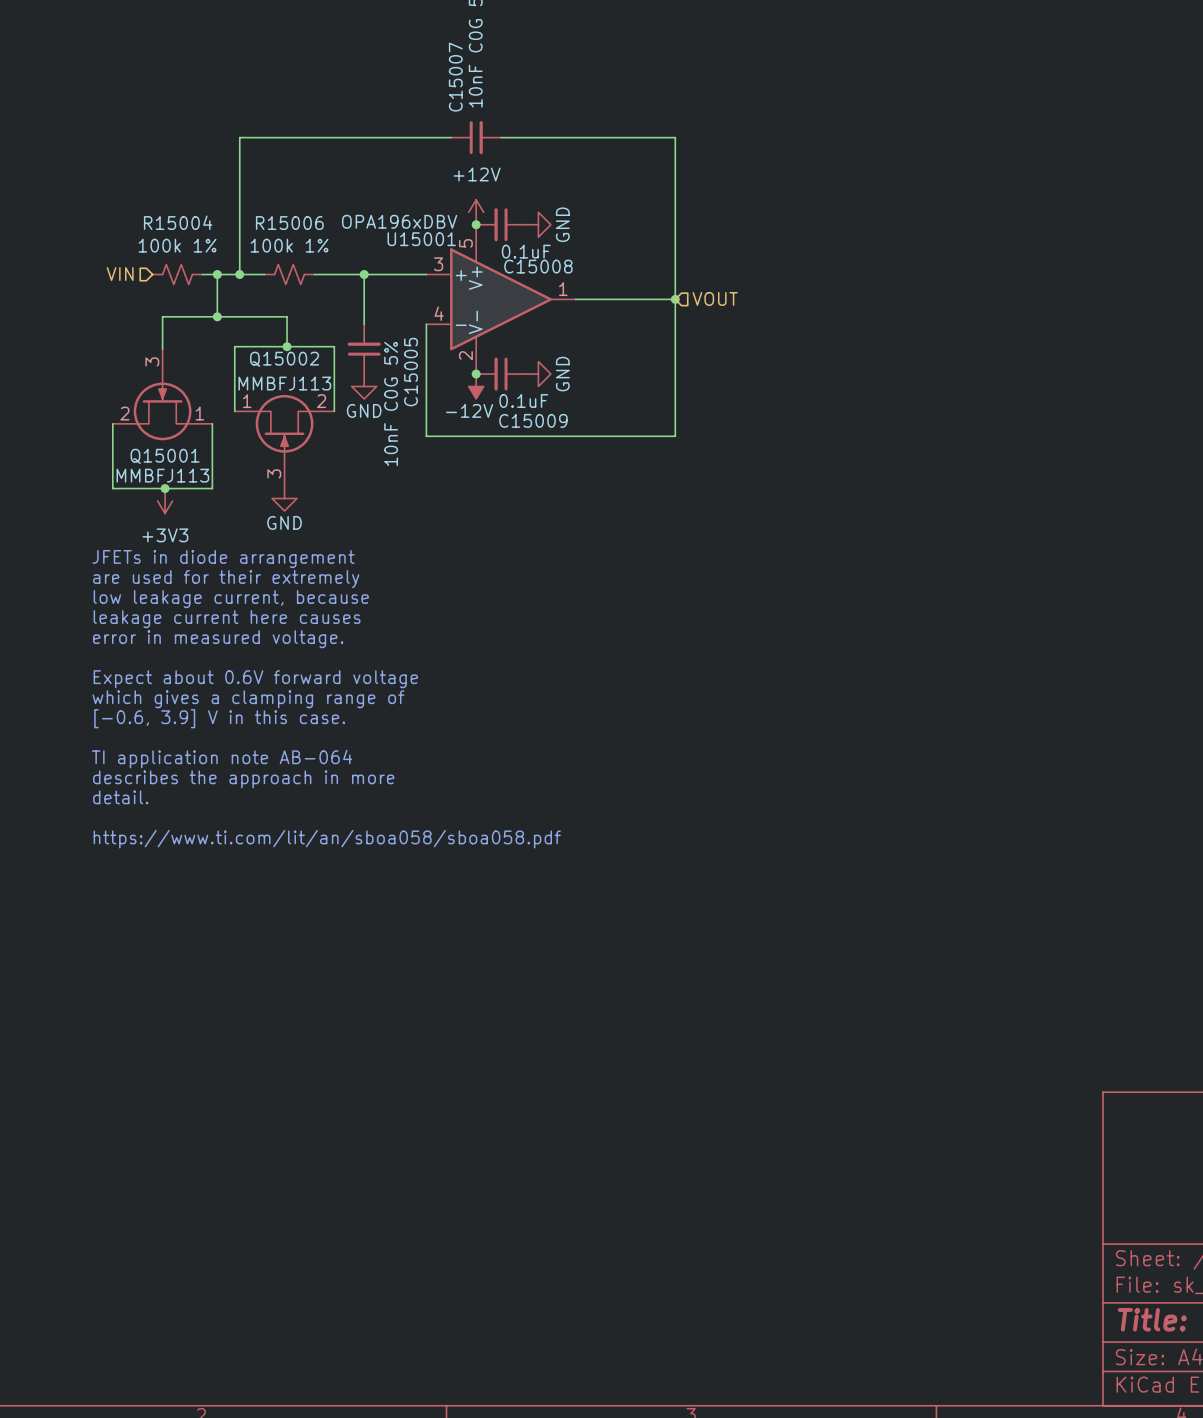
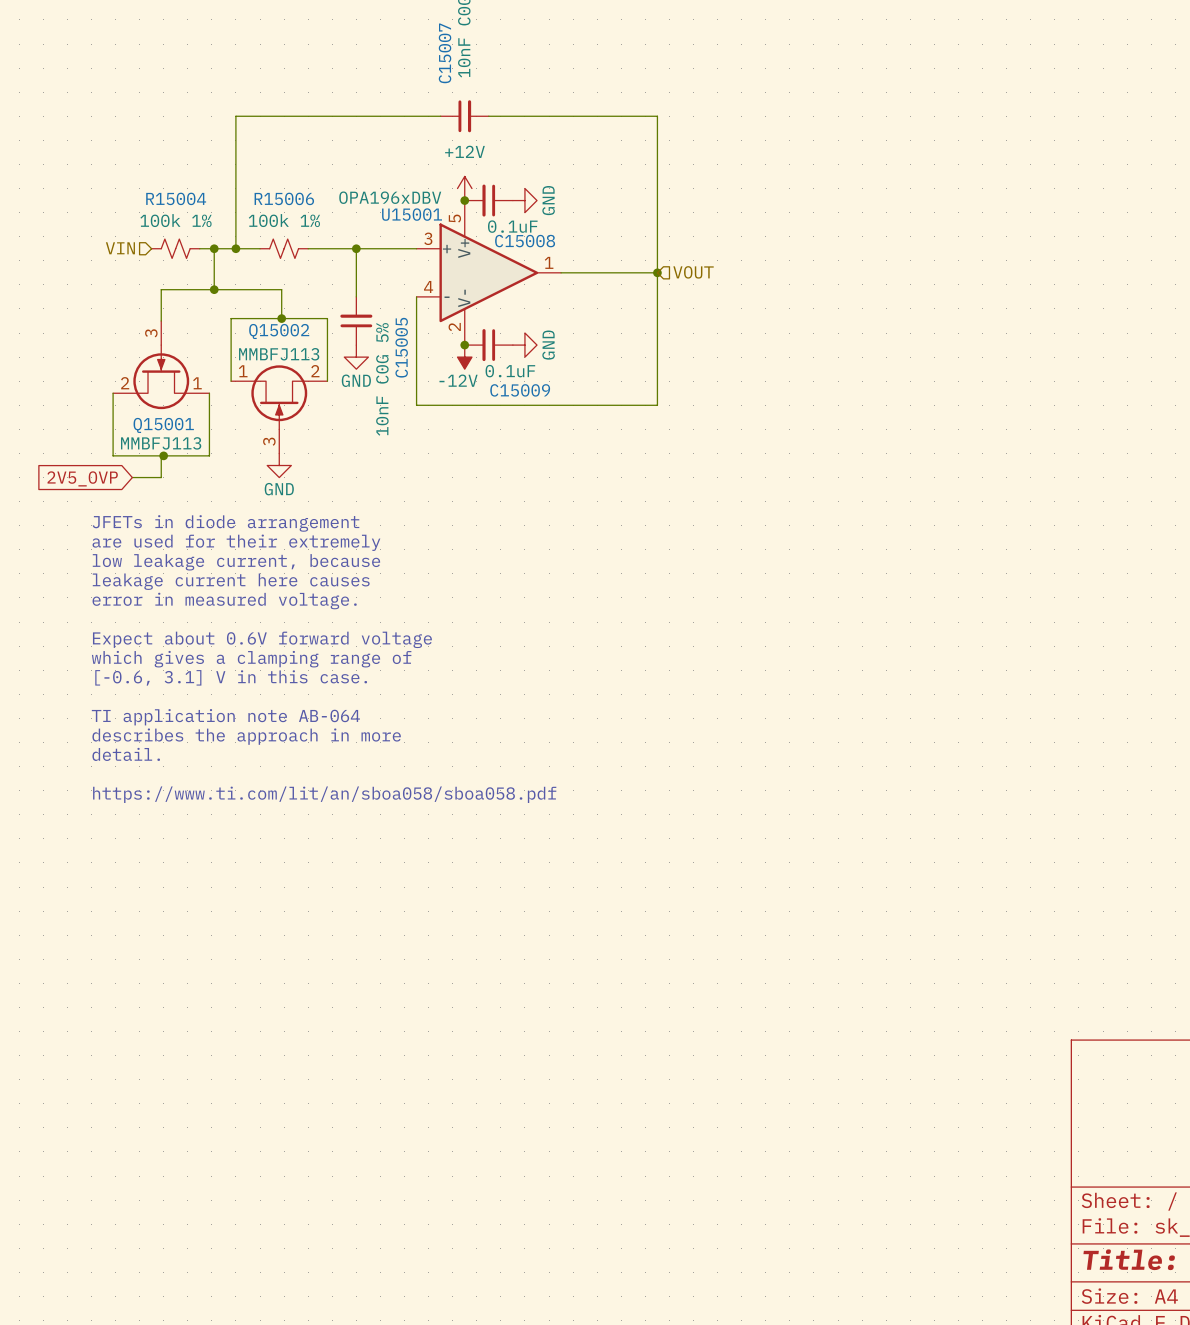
wire: none -> (161, 455) (161, 477) (132, 477)
power symbol: +3V3 (165, 500) -> none
global label: none -> 2V5_OVP (82, 478)
text: [-0.6, 3.9] V in this case. (219, 718) -> [-0.6, 3.1] V in this case. (231, 677)

